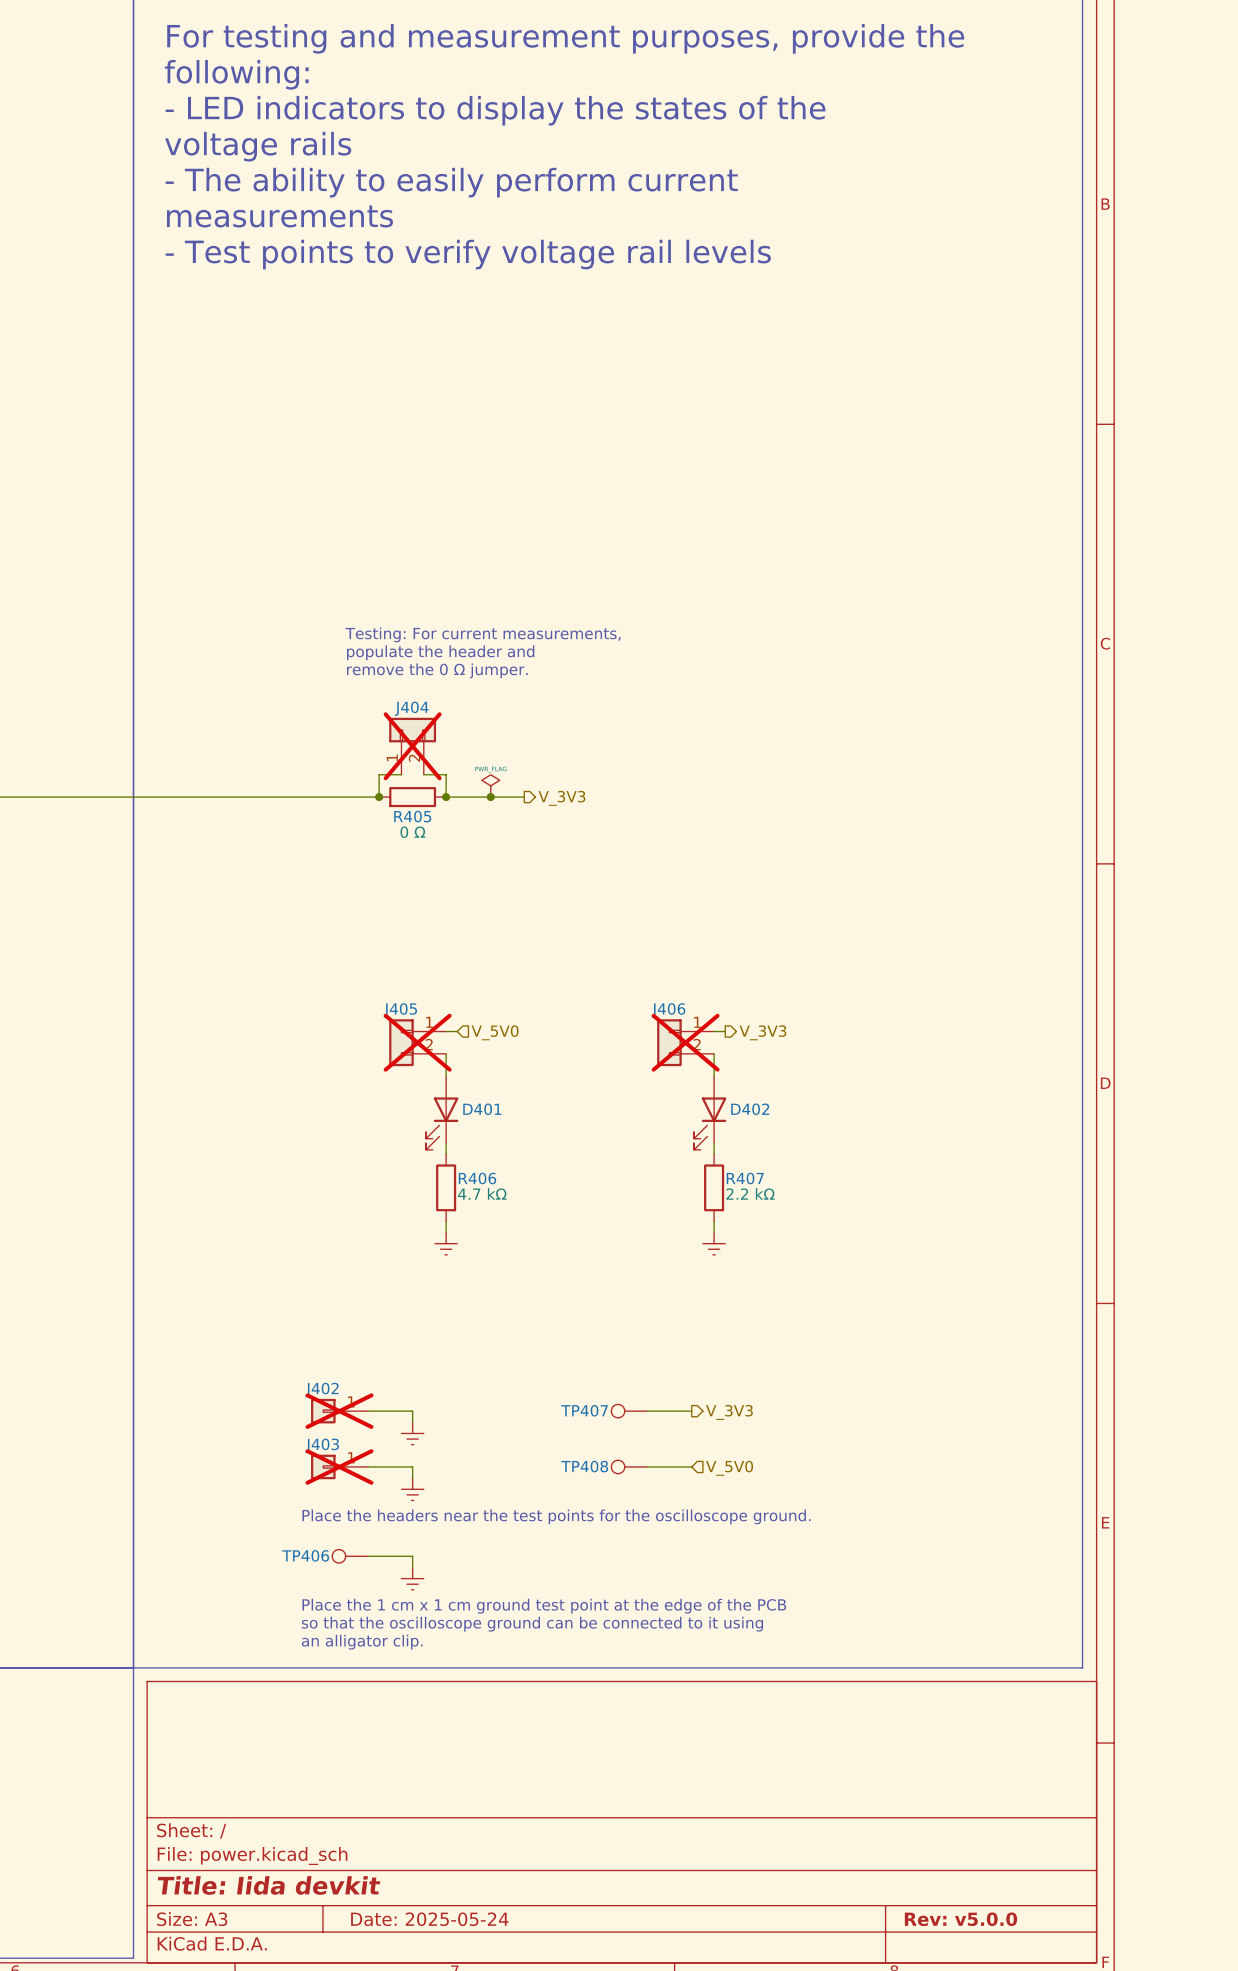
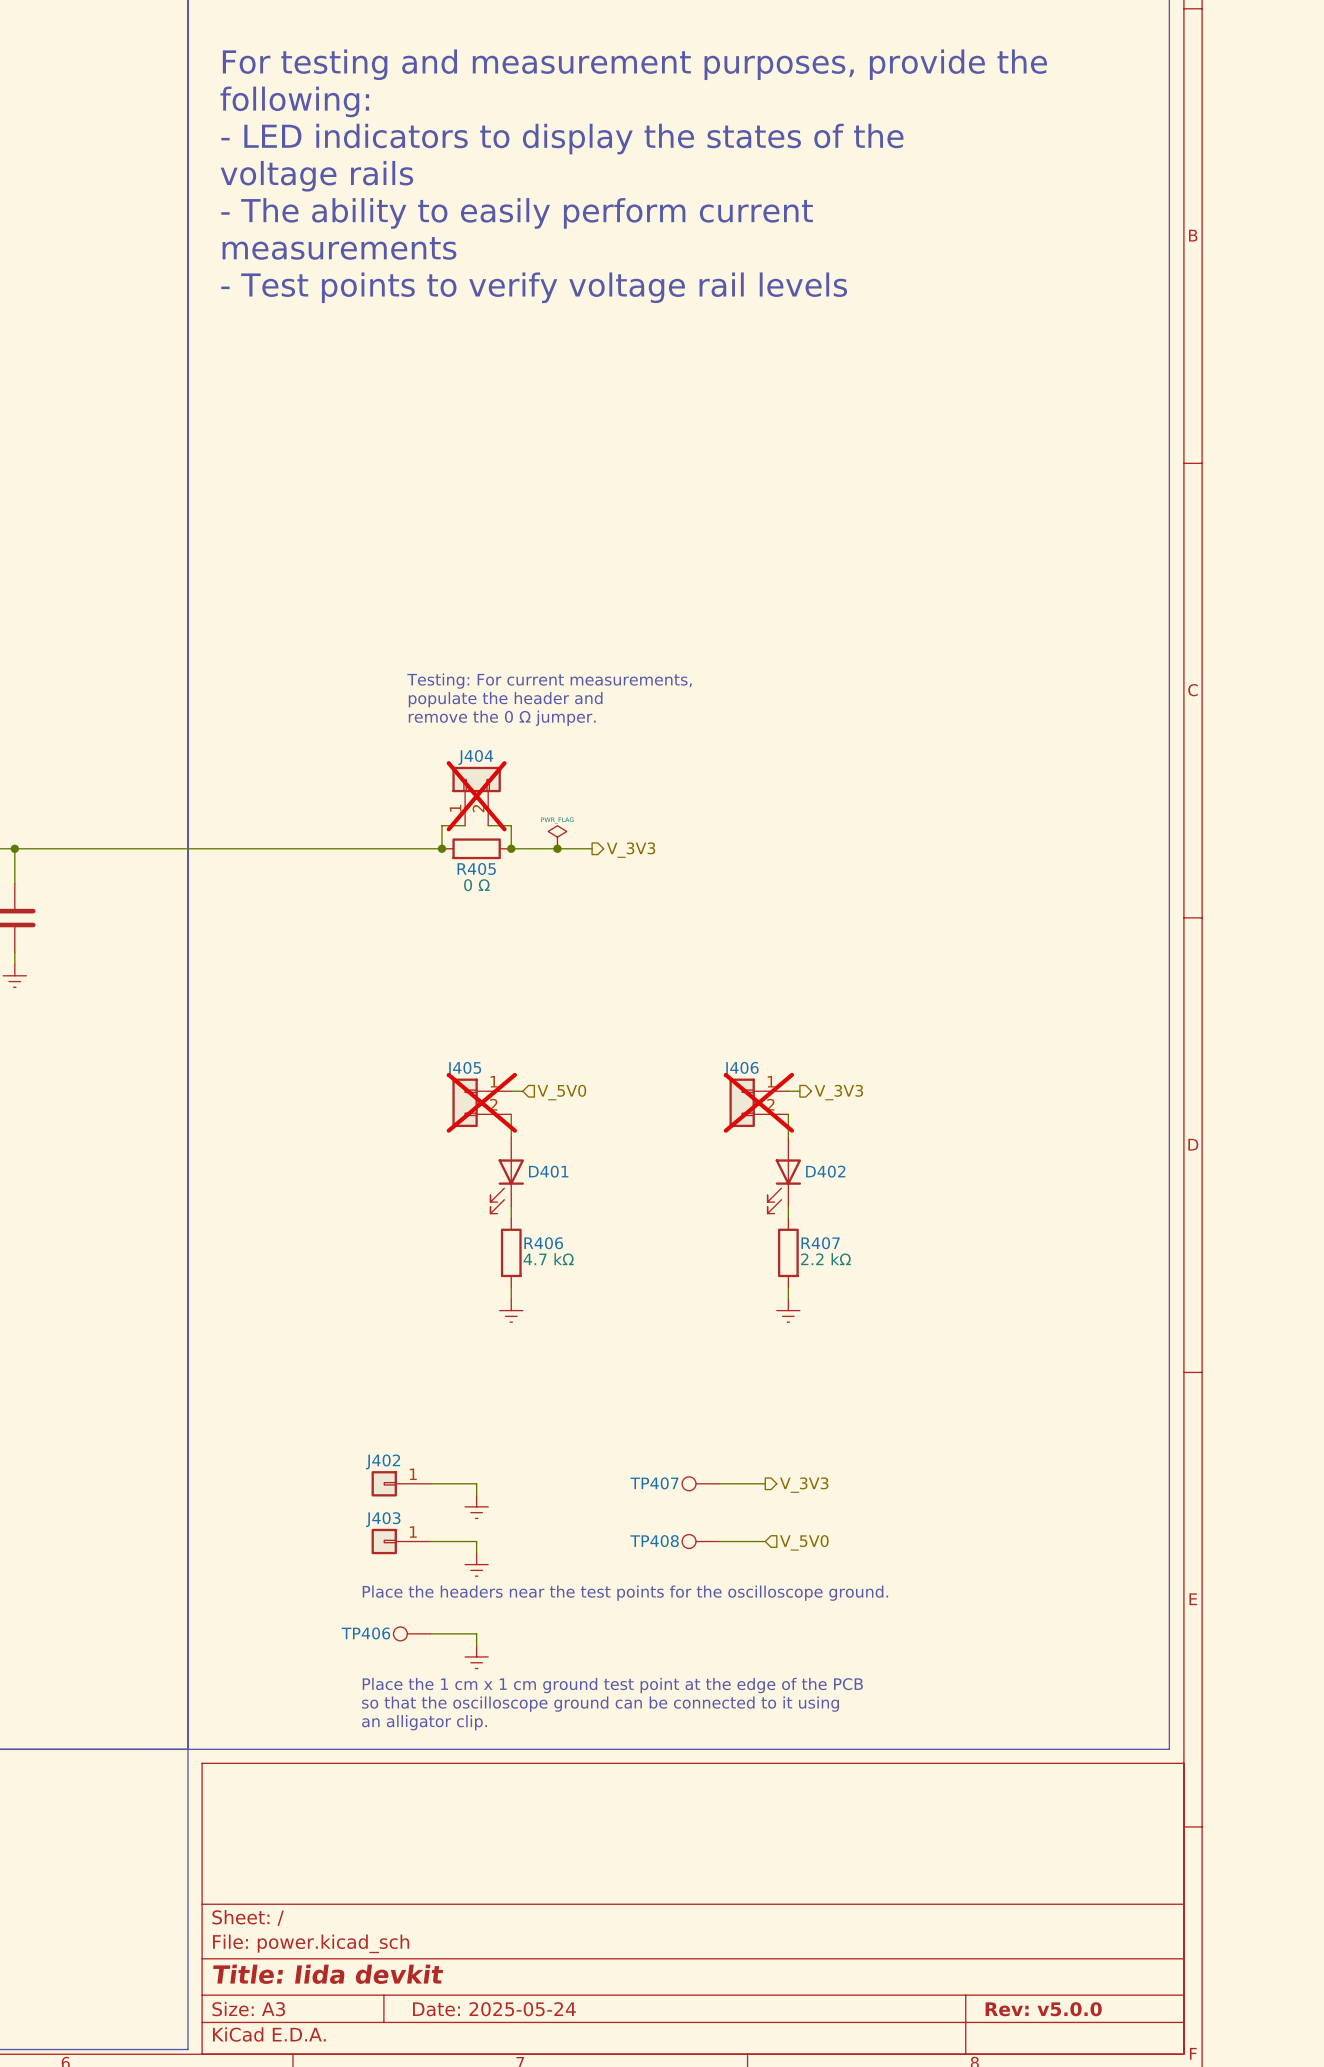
J402 do-not-place cross: (339, 1411) -> none
J403 do-not-place cross: (339, 1466) -> none

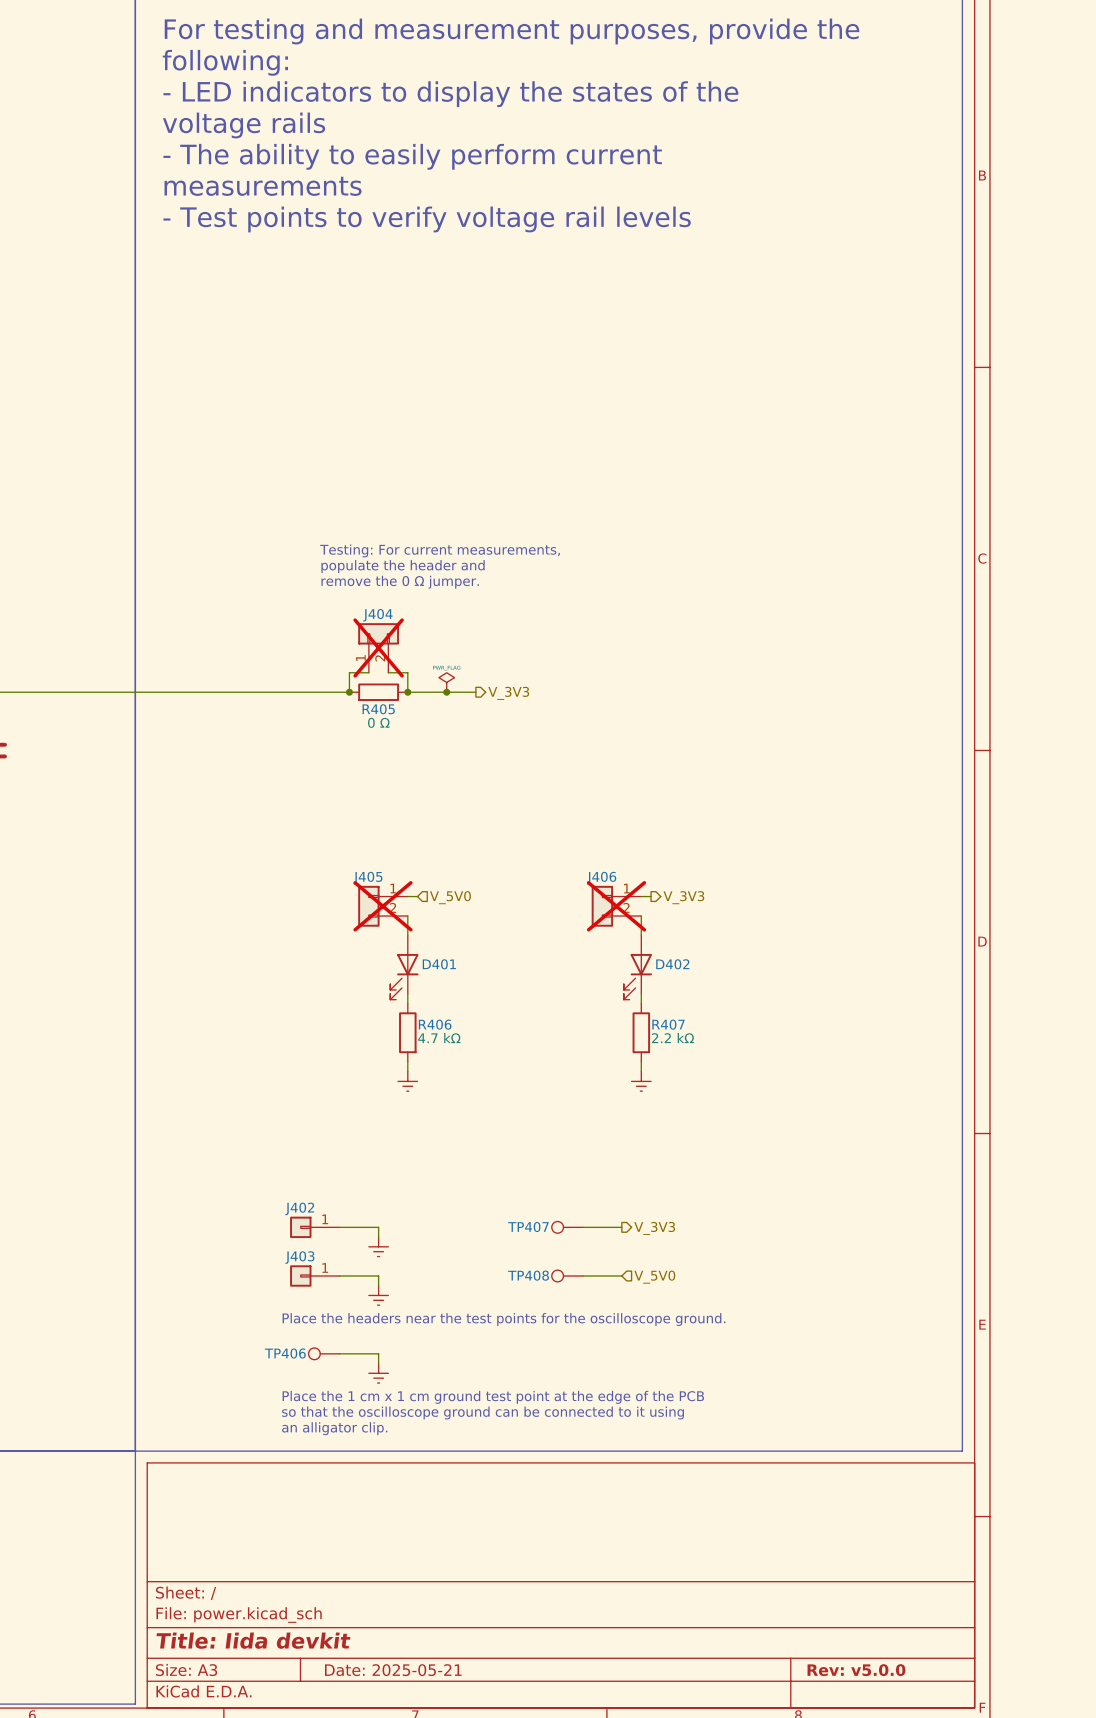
title block: Date: 2025-05-24 (494, 2009) -> Date: 2025-05-21 (393, 1670)

